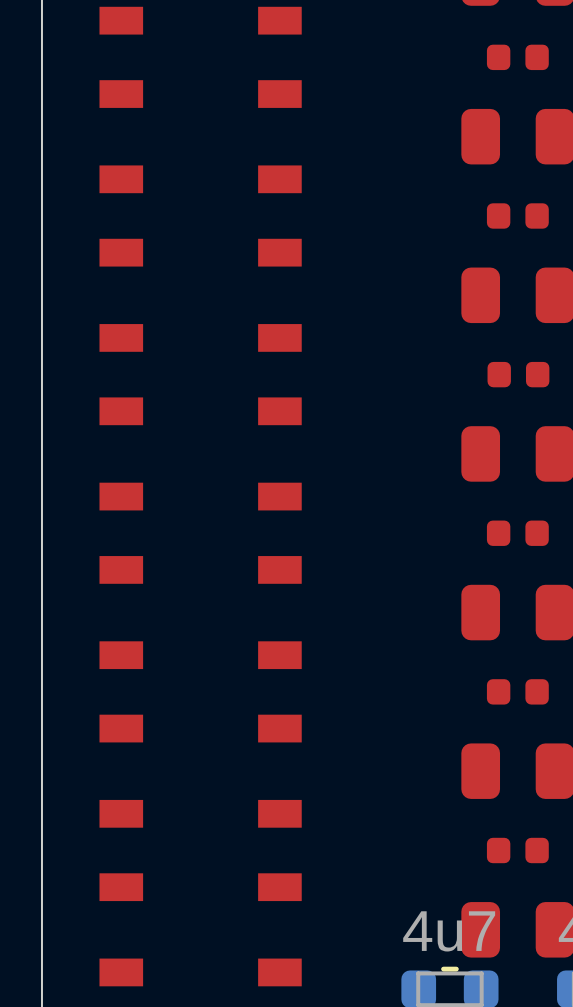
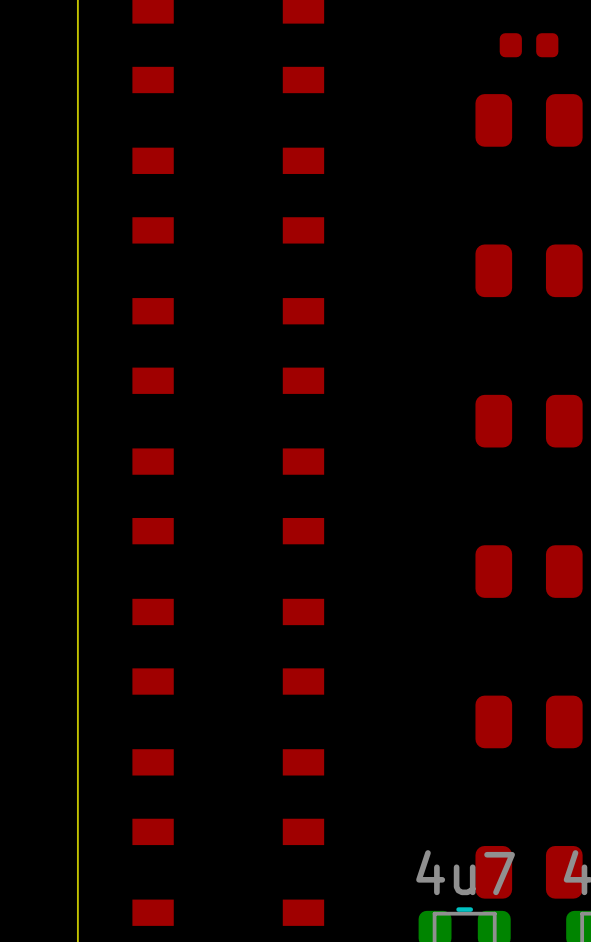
part: (517, 215) -> none
part: (518, 374) -> none
part: (517, 533) -> none
part: (517, 691) -> none
part: (517, 850) -> none

